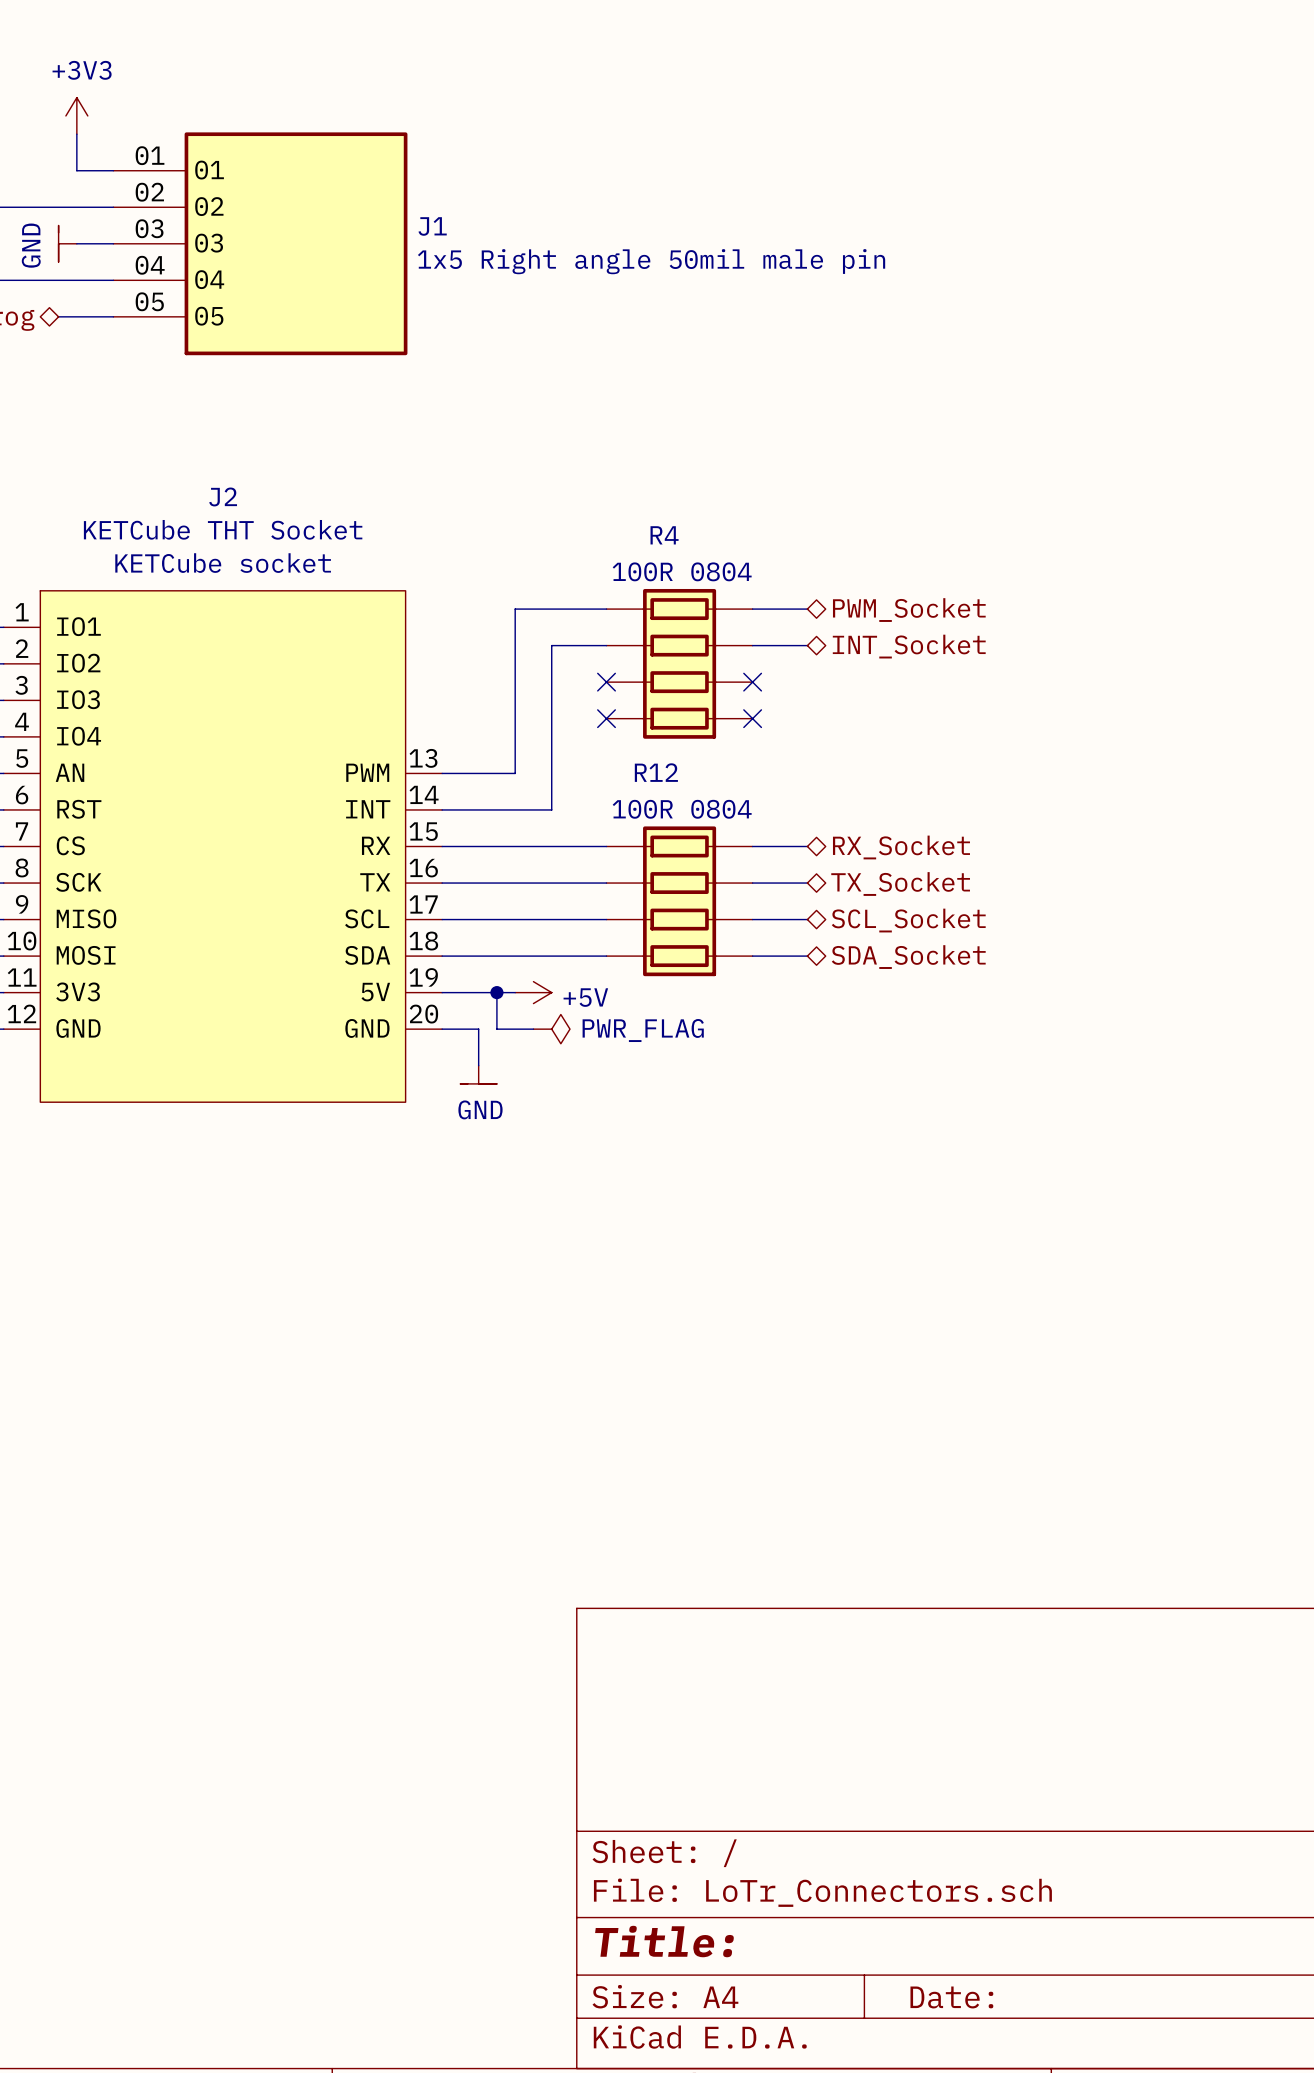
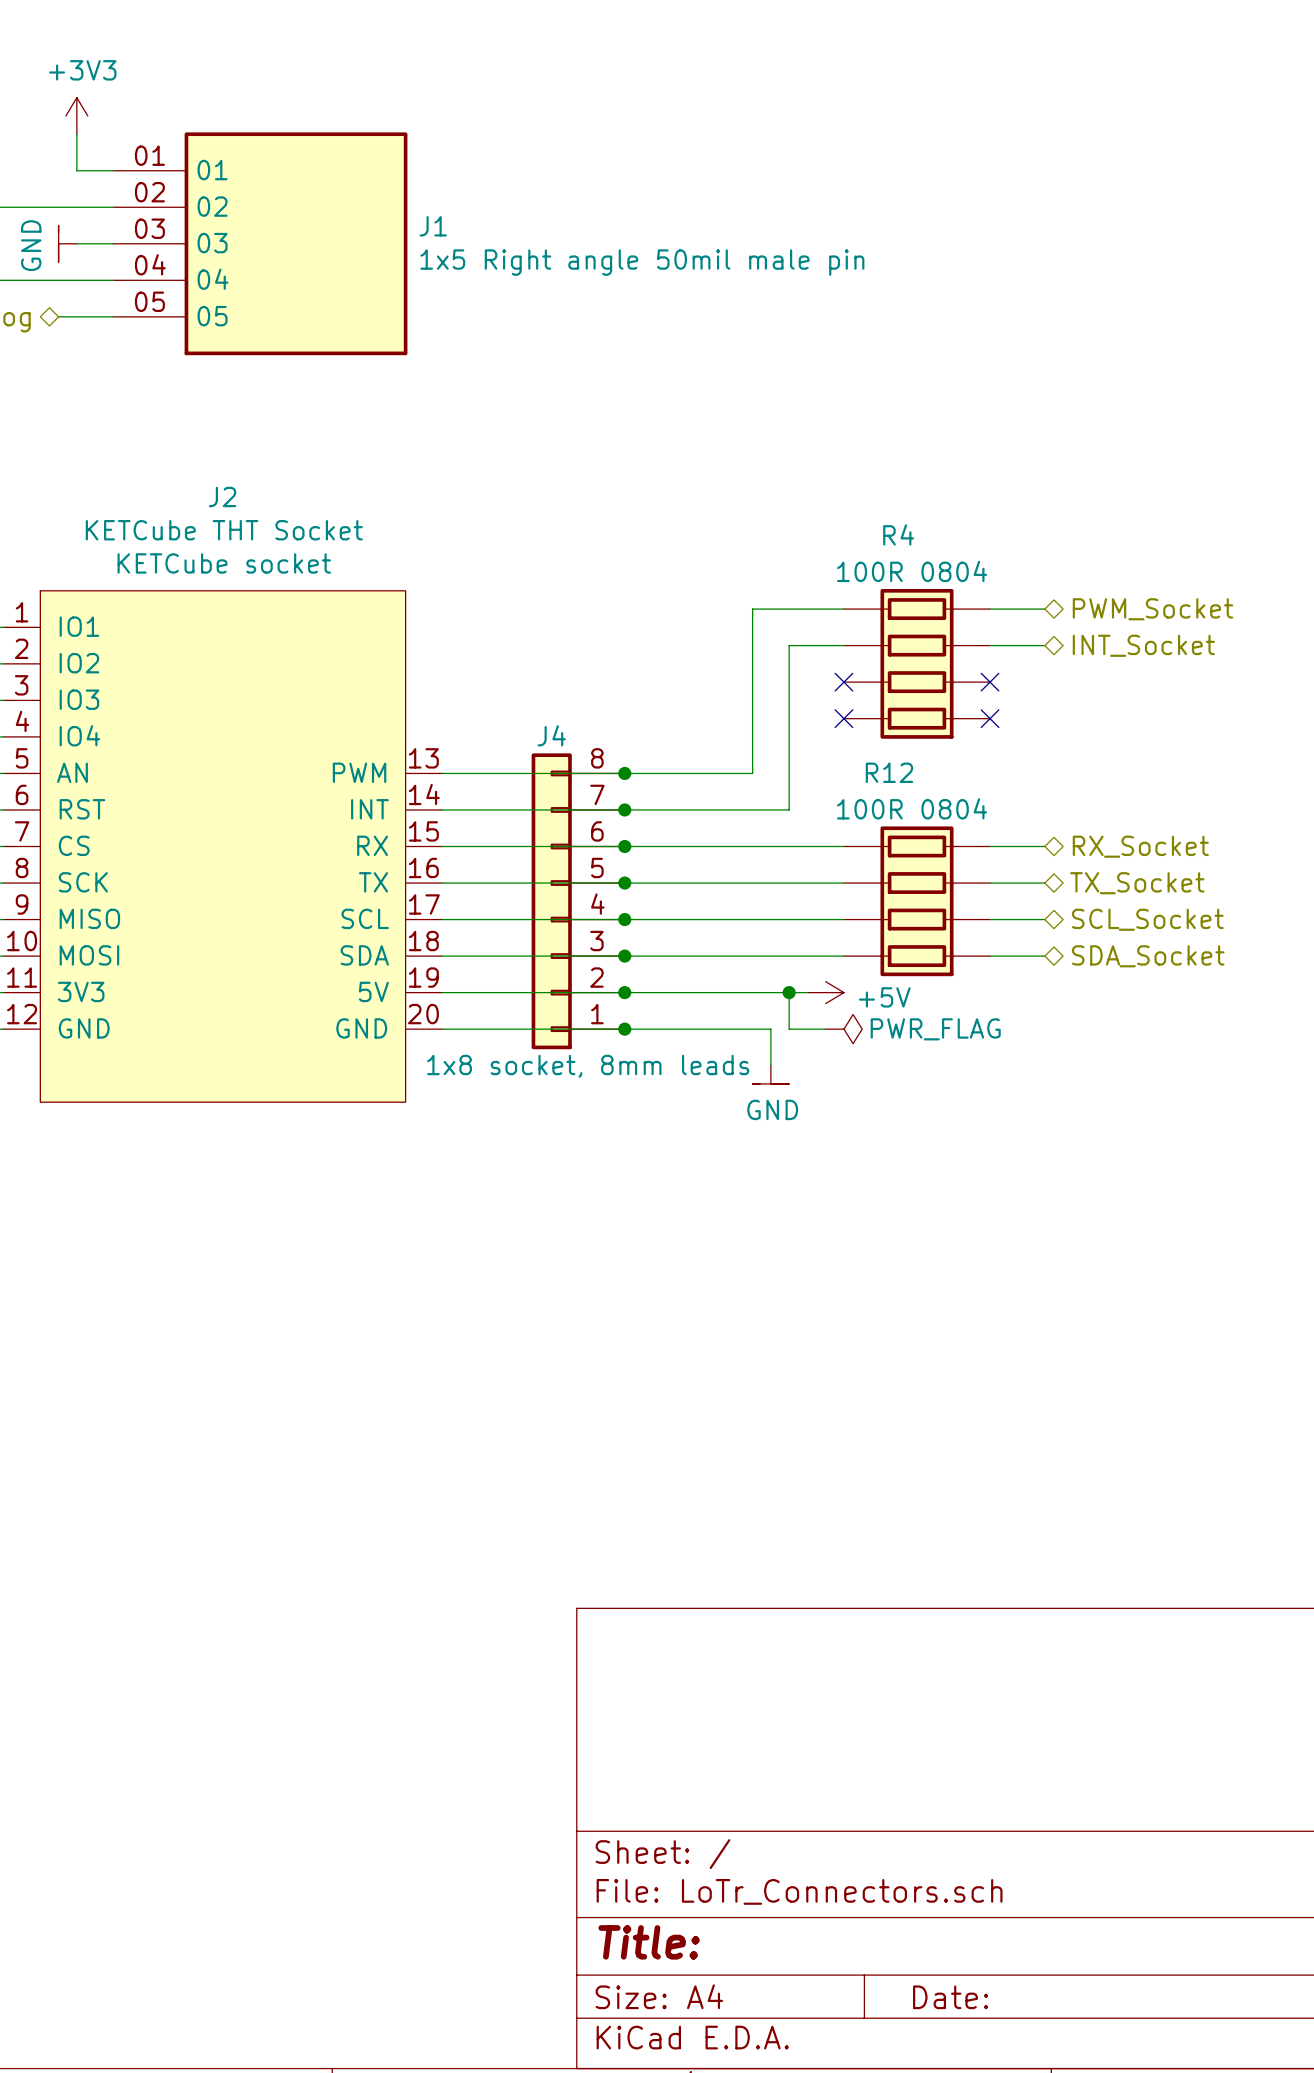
wire: (606, 609) (515, 609) (515, 773) -> (752, 609) (752, 773) (515, 773)
wire: none -> (807, 609) (843, 609)
wire: none -> (990, 609) (1044, 609)
hierarchical label position: PWM_Socket (909, 610) -> PWM_Socket (1152, 609)
wire: (606, 645) (551, 645) (551, 809) -> (789, 645) (789, 809) (551, 809)
wire: (752, 645) (789, 645) -> (807, 645) (843, 645)
wire: none -> (990, 645) (1044, 645)
hierarchical label position: INT_Socket (909, 646) -> INT_Socket (1143, 645)
R4 position: (679, 663) -> (917, 663)
no-connect mark: (606, 682) -> none
no-connect mark: (752, 682) -> none
no-connect mark: none -> (843, 682)
no-connect mark: none -> (990, 682)
no-connect mark: (606, 718) -> none
no-connect mark: (752, 718) -> none
no-connect mark: none -> (843, 718)
no-connect mark: none -> (990, 718)
junction: none -> (624, 773)
junction: none -> (624, 809)
junction: none -> (624, 846)
wire: none -> (807, 846) (843, 846)
wire: none -> (990, 846) (1044, 846)
hierarchical label position: RX_Socket (901, 847) -> RX_Socket (1140, 846)
junction: none -> (624, 883)
wire: none -> (807, 883) (843, 883)
wire: none -> (990, 883) (1044, 883)
hierarchical label position: TX_Socket (900, 884) -> TX_Socket (1137, 883)
J4: none -> (578, 901)
R12 position: (679, 901) -> (917, 901)
junction: none -> (624, 919)
wire: none -> (807, 919) (843, 919)
wire: none -> (990, 919) (1044, 919)
hierarchical label position: SCL_Socket (908, 920) -> SCL_Socket (1147, 919)
junction: none -> (624, 956)
wire: none -> (807, 956) (843, 956)
wire: none -> (990, 956) (1044, 956)
hierarchical label position: SDA_Socket (908, 957) -> SDA_Socket (1148, 956)
wire: (496, 992) (496, 1029) -> (478, 1029) (496, 1029)
junction: (496, 992) -> none
wire: none -> (515, 992) (807, 992)
power symbol position: +5V (533, 992) -> +5V (825, 992)
junction: none -> (624, 992)
wire: none -> (789, 992) (789, 1029) (825, 1029)
junction: none -> (789, 992)
wire: (478, 1029) (478, 1065) -> none
wire: none -> (533, 1029) (770, 1029) (770, 1065)
power symbol position: PWR_FLAG (551, 1029) -> PWR_FLAG (843, 1029)
junction: none -> (624, 1029)
power symbol position: GND (478, 1074) -> GND (770, 1074)

